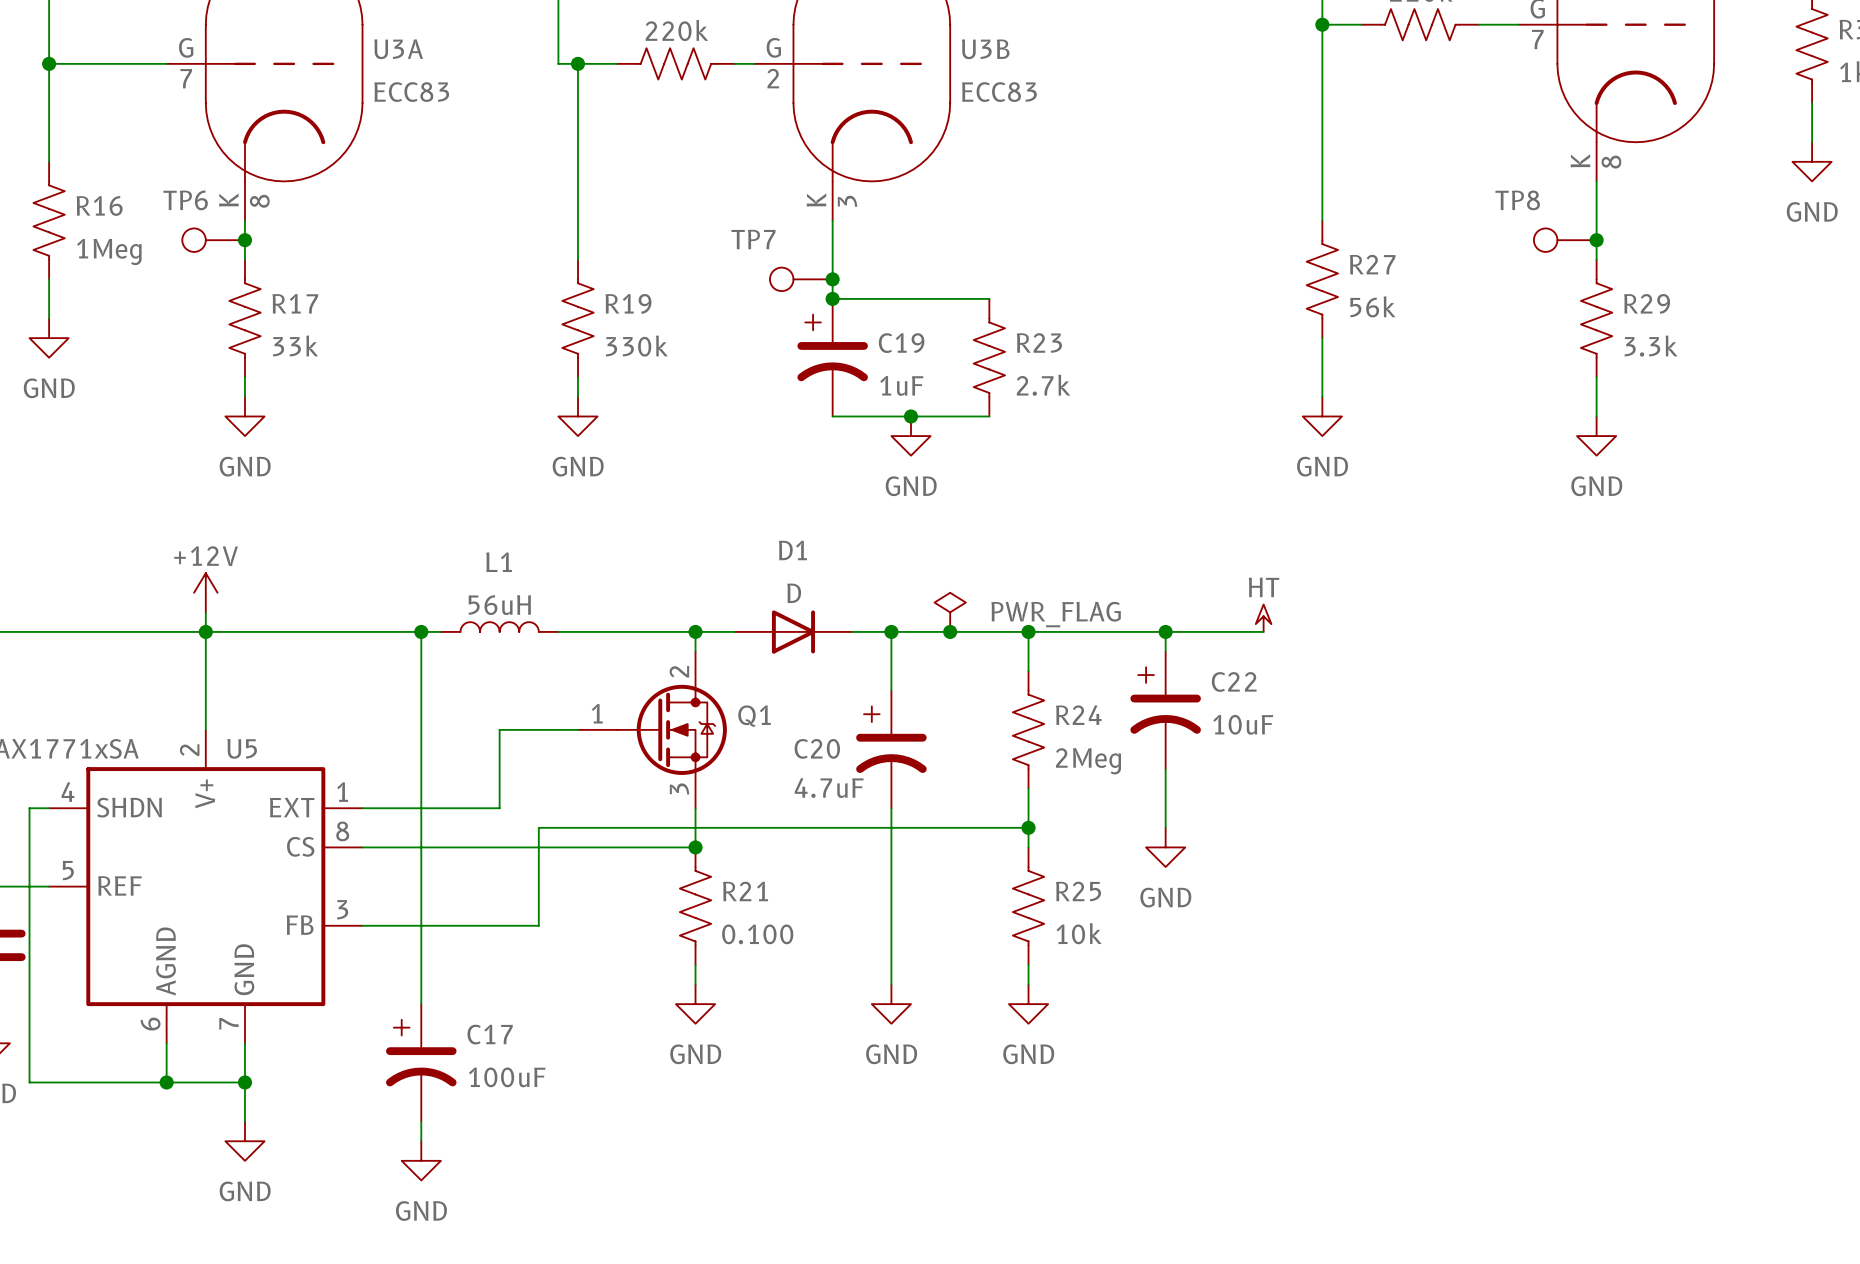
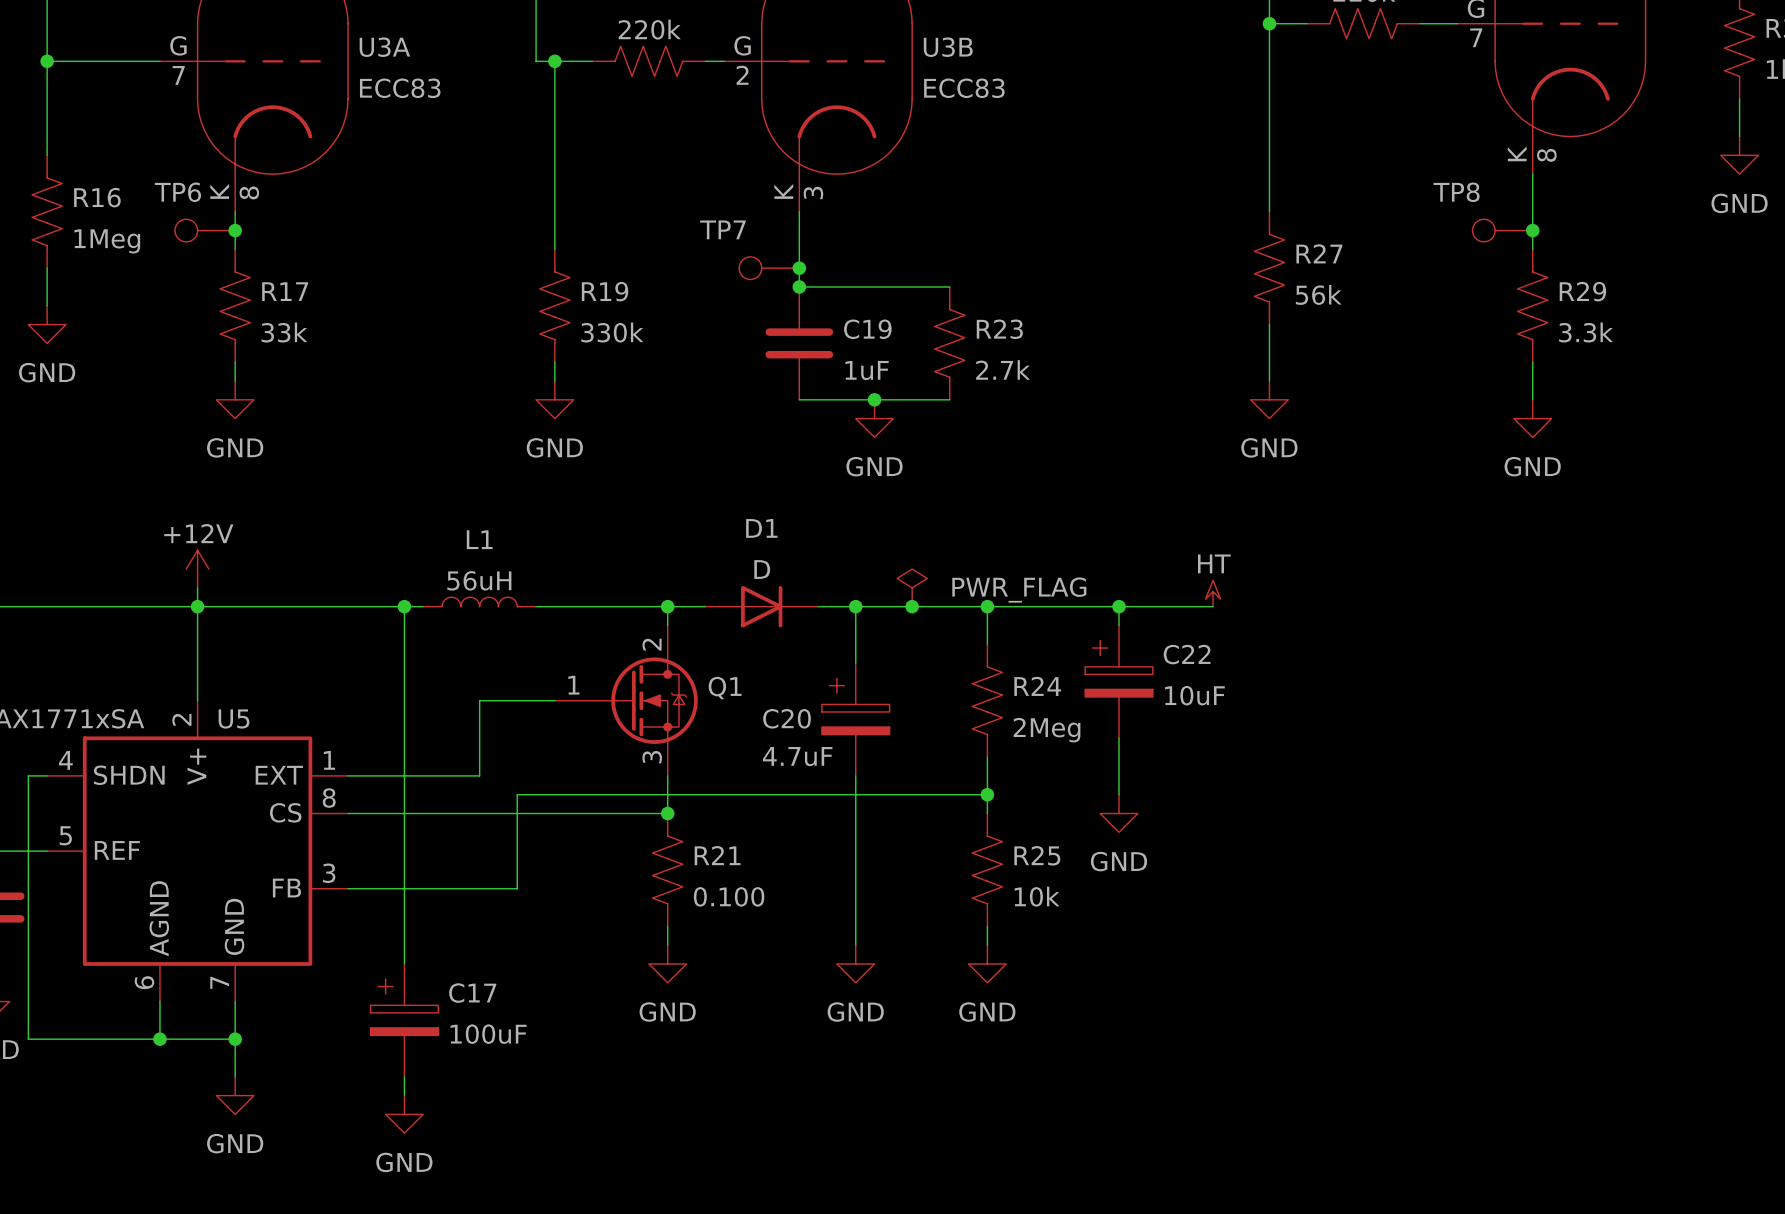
C19 symbol: [797, 298, 868, 417] -> [765, 286, 834, 400]
C22 symbol: [1130, 651, 1201, 770] -> [1085, 625, 1153, 739]
C20 symbol: [856, 690, 927, 809] -> [821, 663, 890, 776]
C17 symbol: [386, 1004, 457, 1122] -> [370, 963, 439, 1077]

